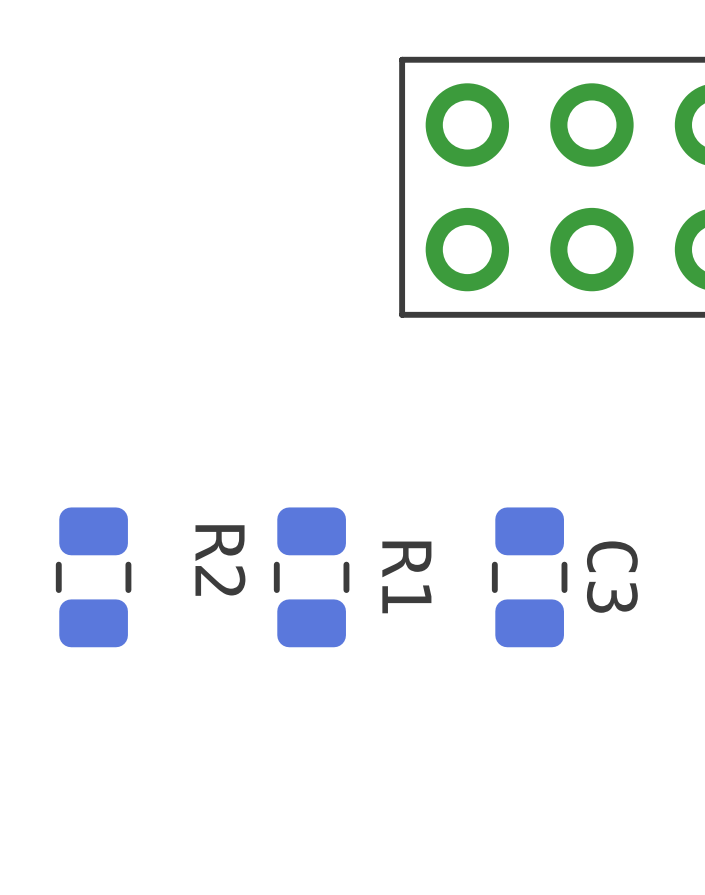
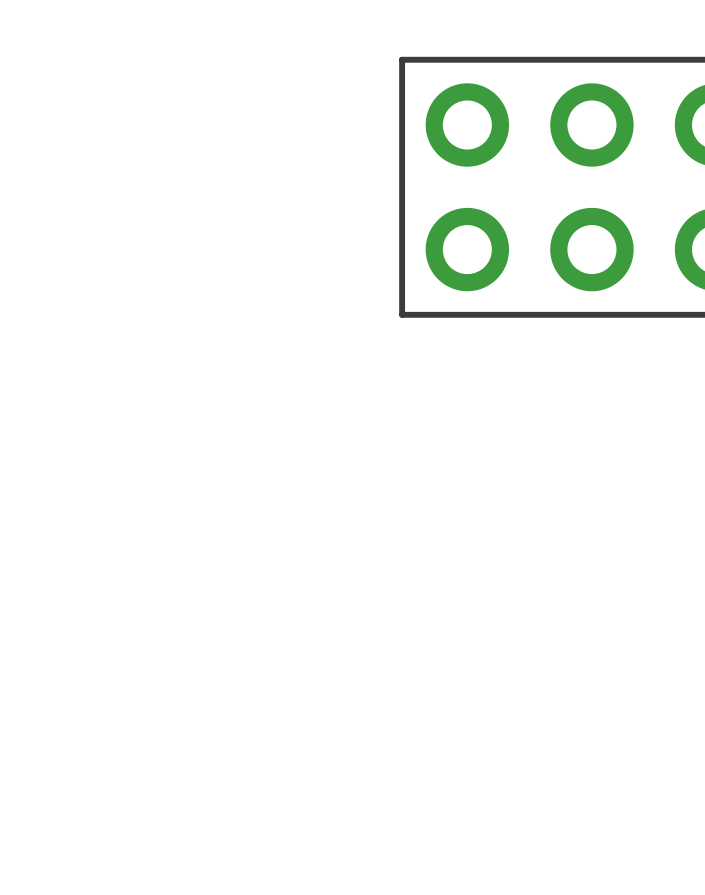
R2: (93, 577) -> none
R1: (311, 577) -> none
C3: (529, 577) -> none

